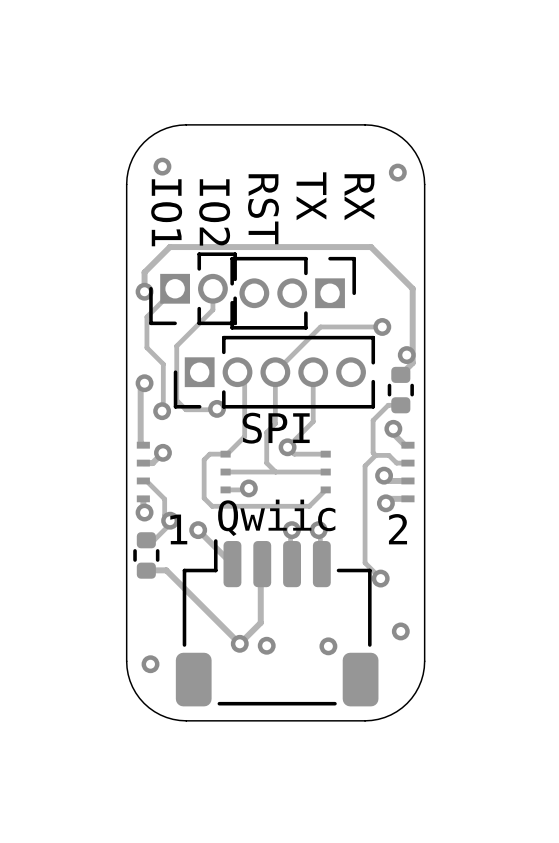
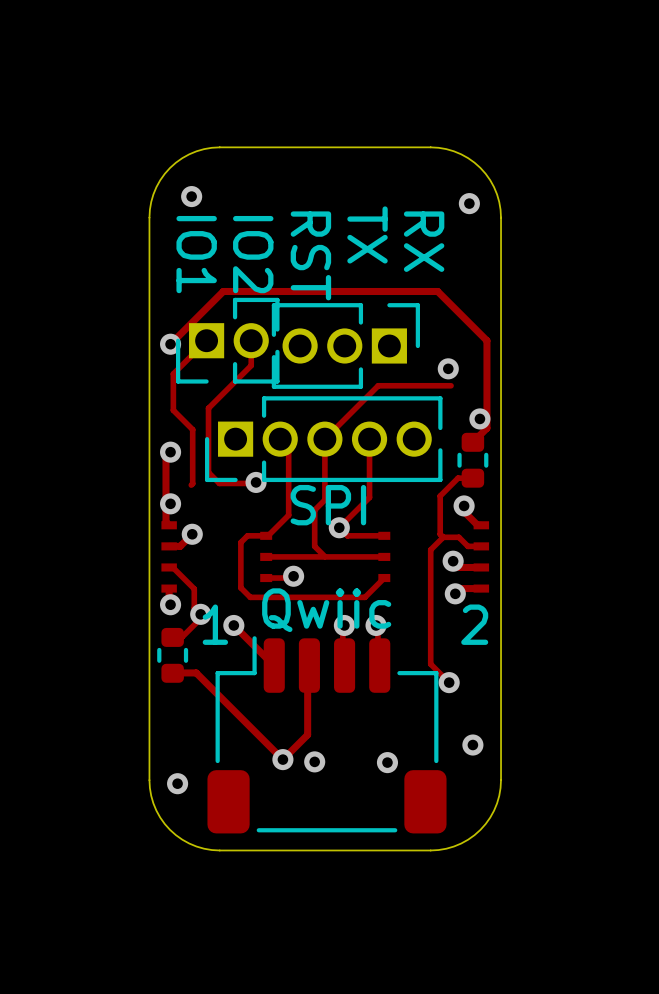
track: (189, 247) (169, 247) (144, 272) (144, 291) -> (223, 291) (170, 344)
via position: (382, 326) -> (448, 368)
via position: (162, 411) -> (170, 503)

